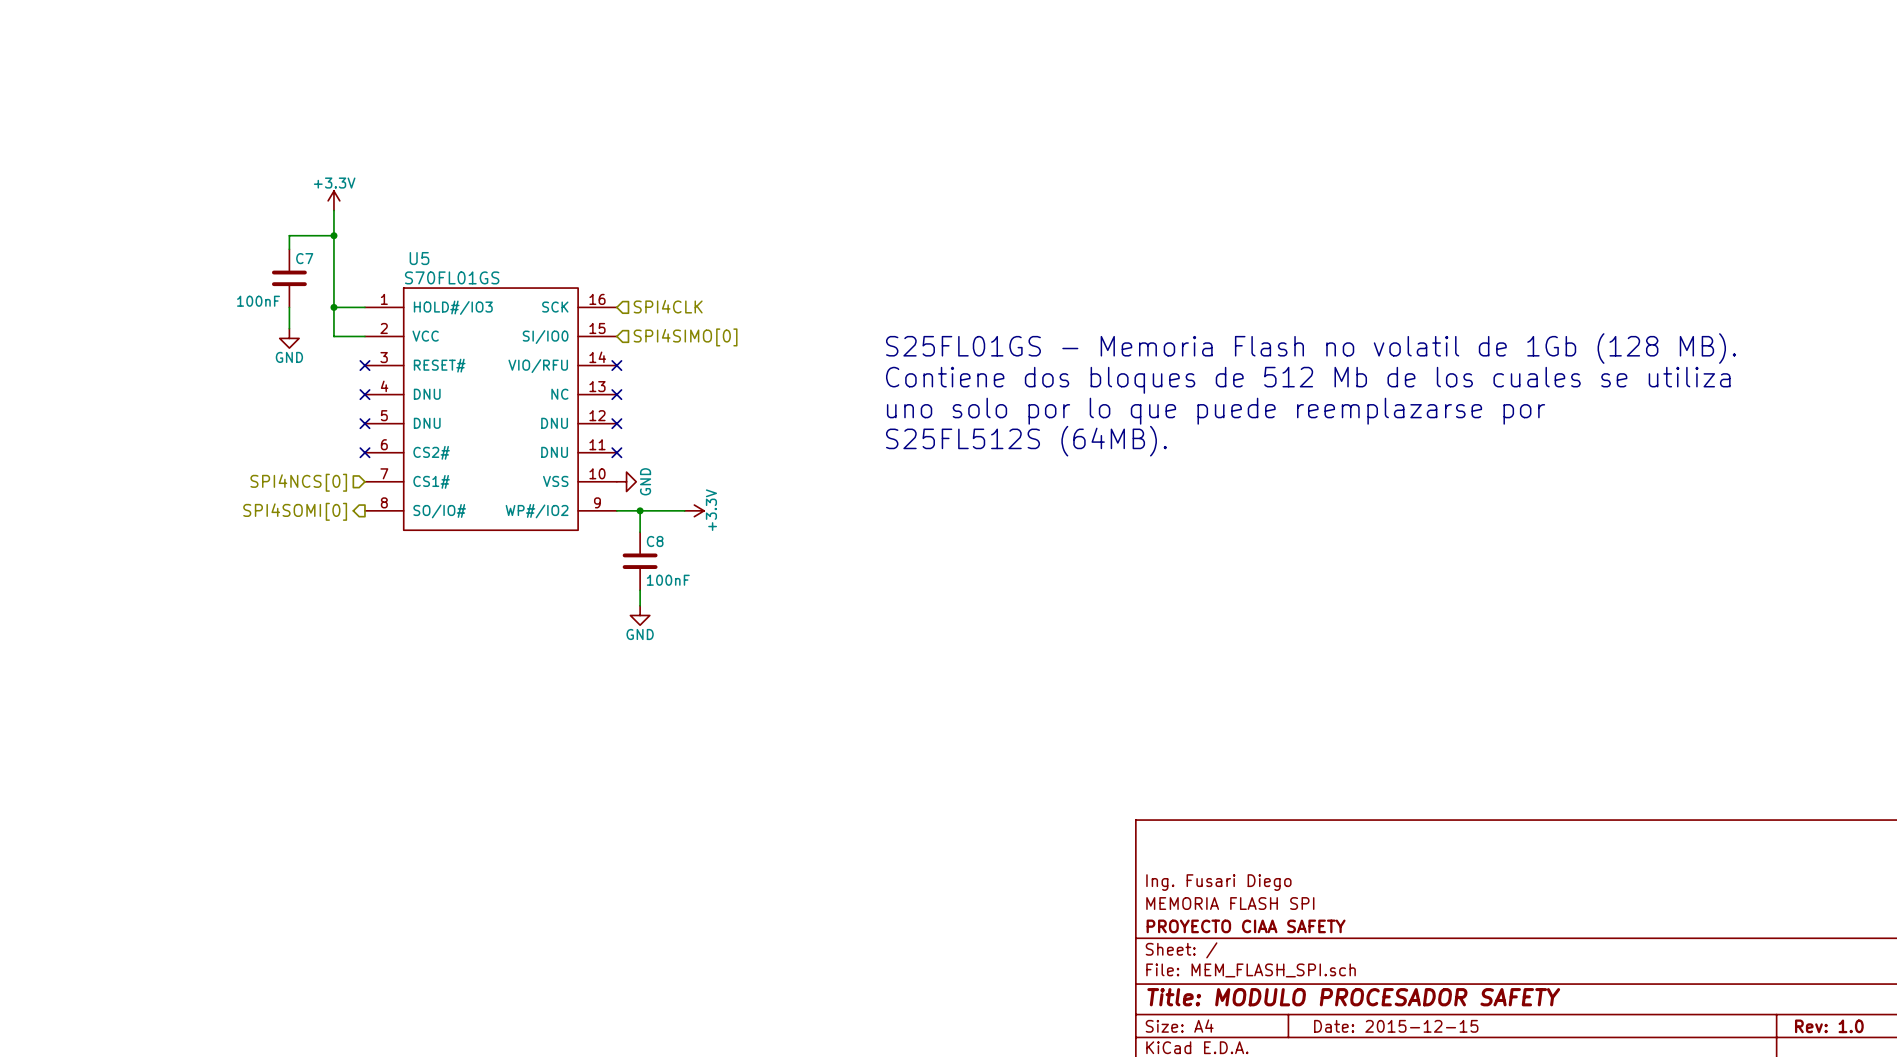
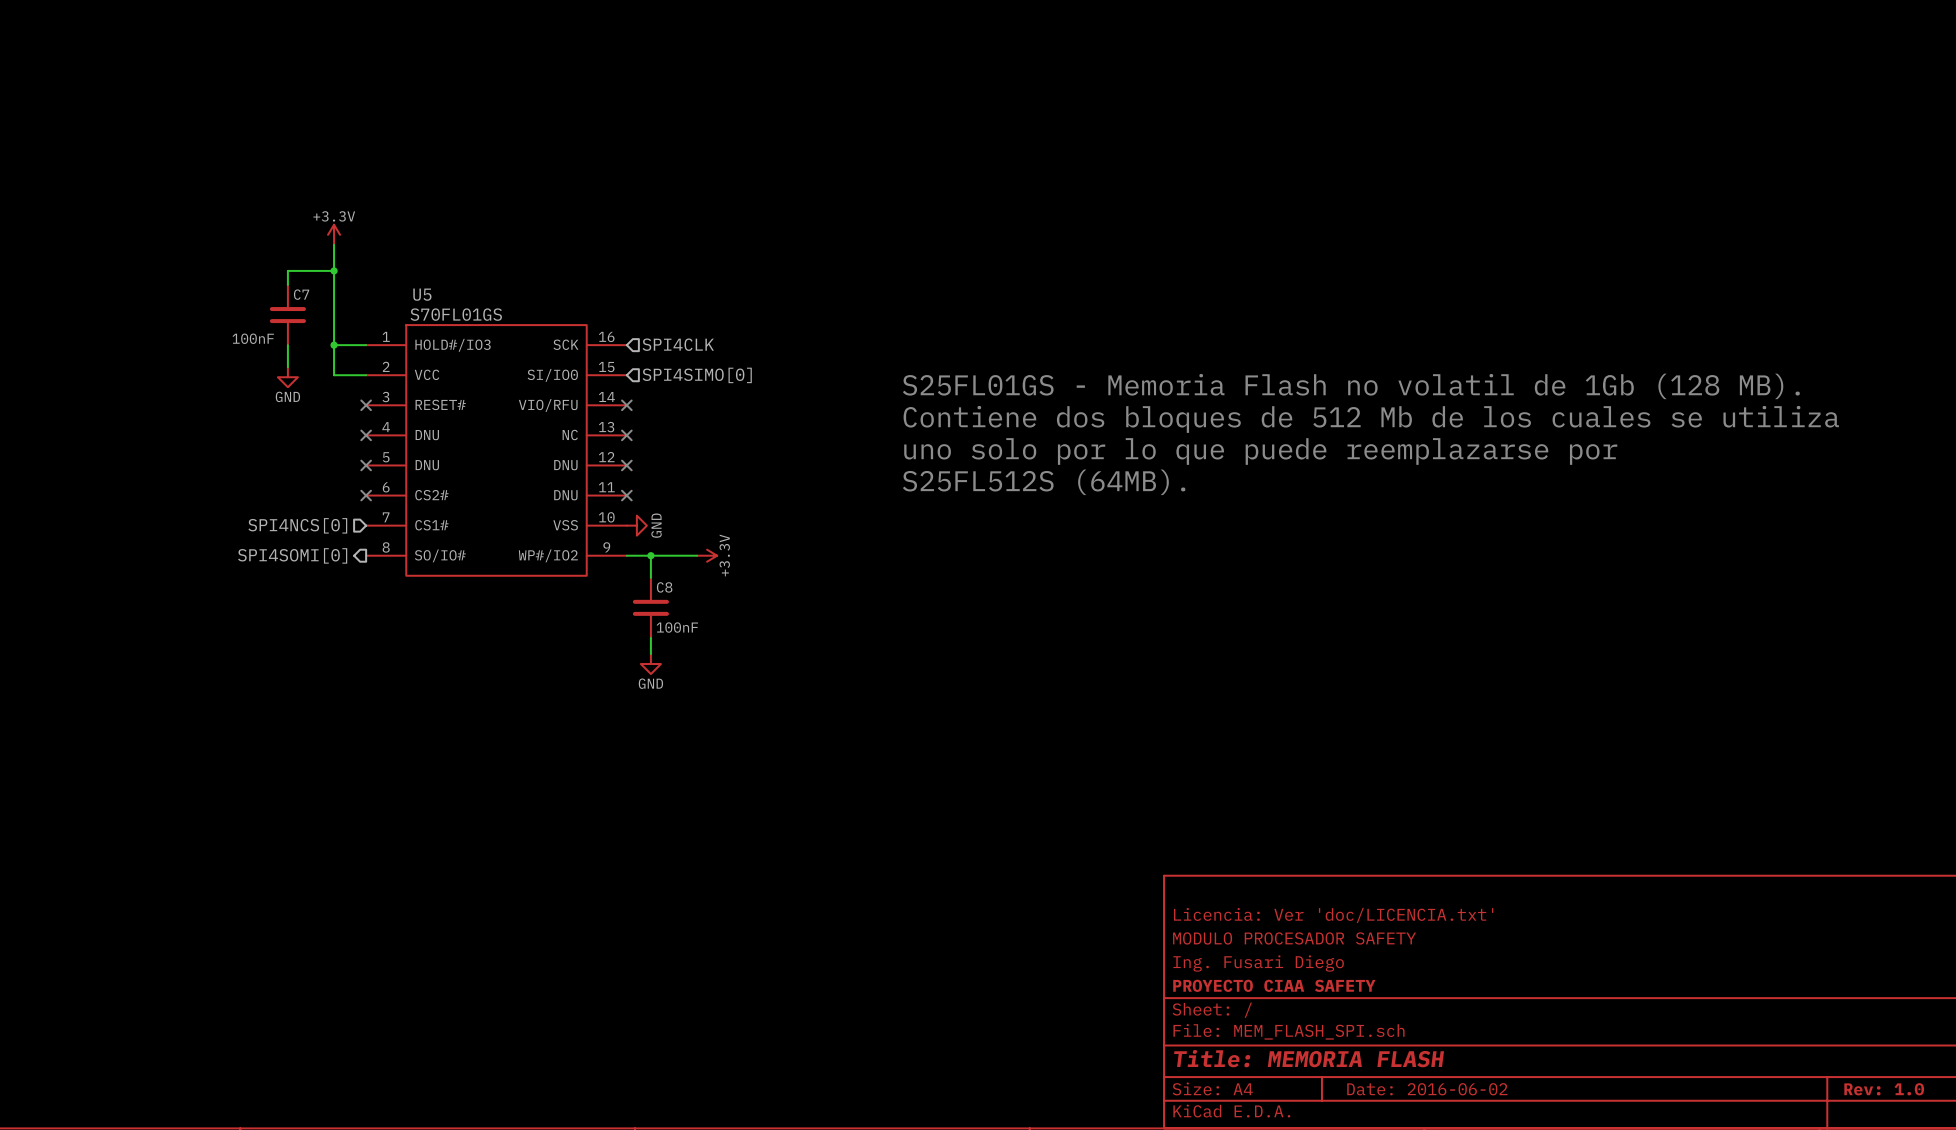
title block: none -> Licencia: Ver 'doc/LICENCIA.txt' (1333, 915)
title block: Ing. Fusari Diego (1218, 882) -> MODULO PROCESADOR SAFETY (1294, 938)
title block: MEMORIA FLASH SPI (1230, 903) -> Ing. Fusari Diego (1258, 963)
title block: Title: MODULO PROCESADOR SAFETY (1353, 997) -> Title: MEMORIA FLASH (1309, 1058)
title block: Date: 2015-12-15 (1396, 1026) -> Date: 2016-06-02 (1427, 1089)

